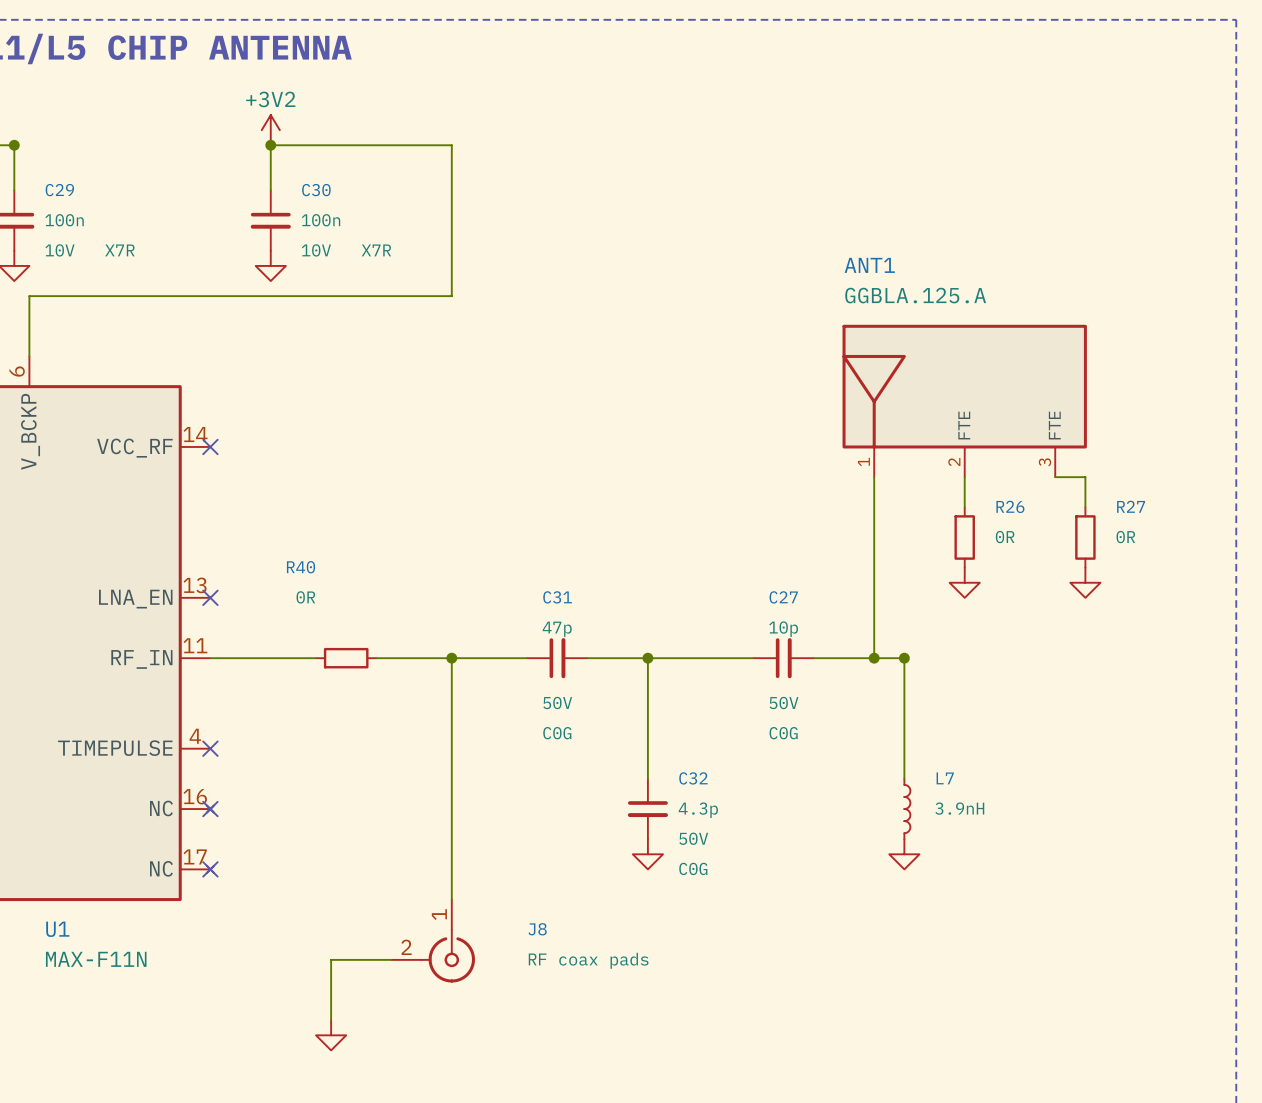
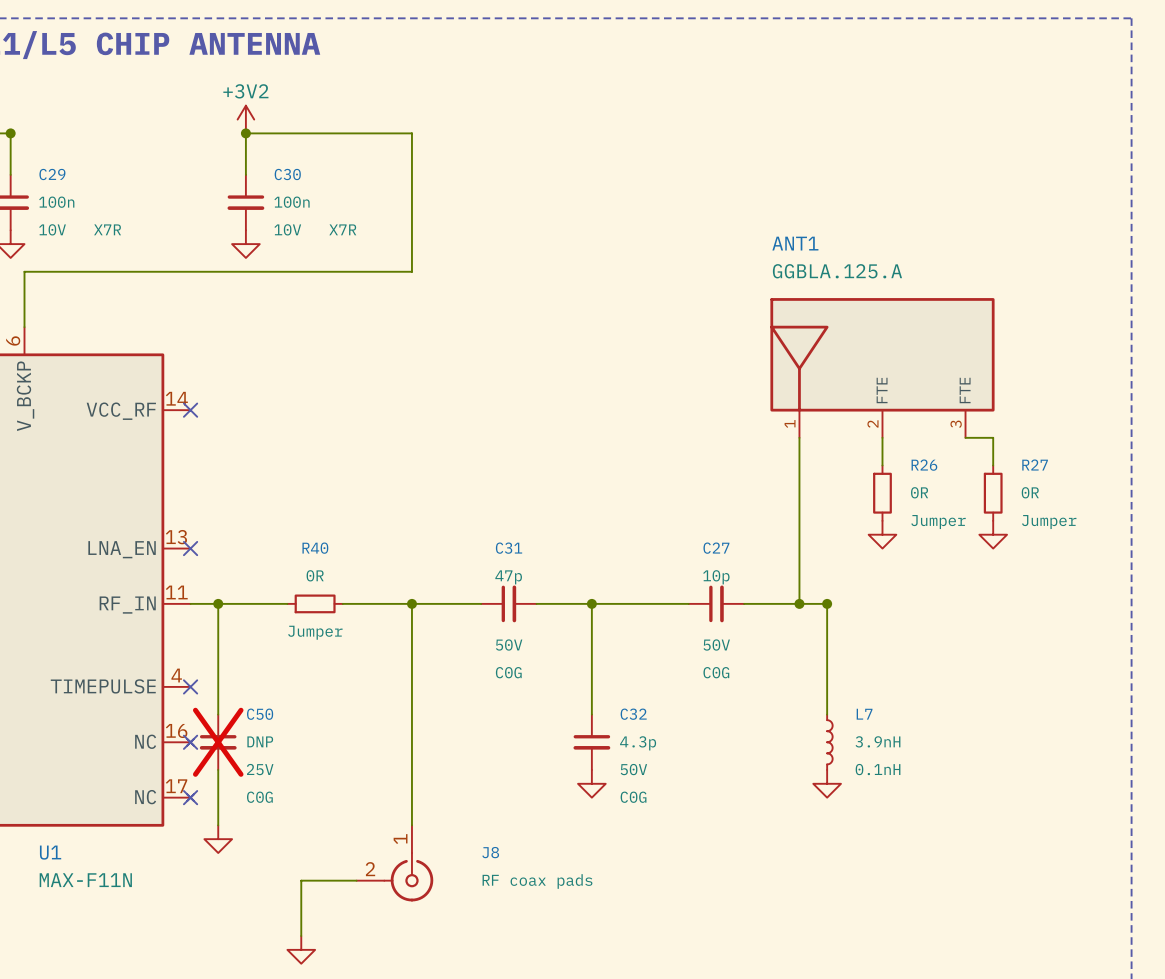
R40 name position: R40 (301, 567) -> R40 (315, 548)
R26 text: none -> Jumper (938, 522)
R27 text: none -> Jumper (1049, 522)
R40 value position: 0R (305, 597) -> 0R (315, 575)
wire: none -> (218, 603) (218, 714)
junction: none -> (218, 603)
R40 text: none -> Jumper (315, 632)
C50: none -> DNP (218, 742)
L7 text: none -> 0.1nH (878, 769)
wire: none -> (218, 769) (218, 825)
power symbol: none -> (218, 839)

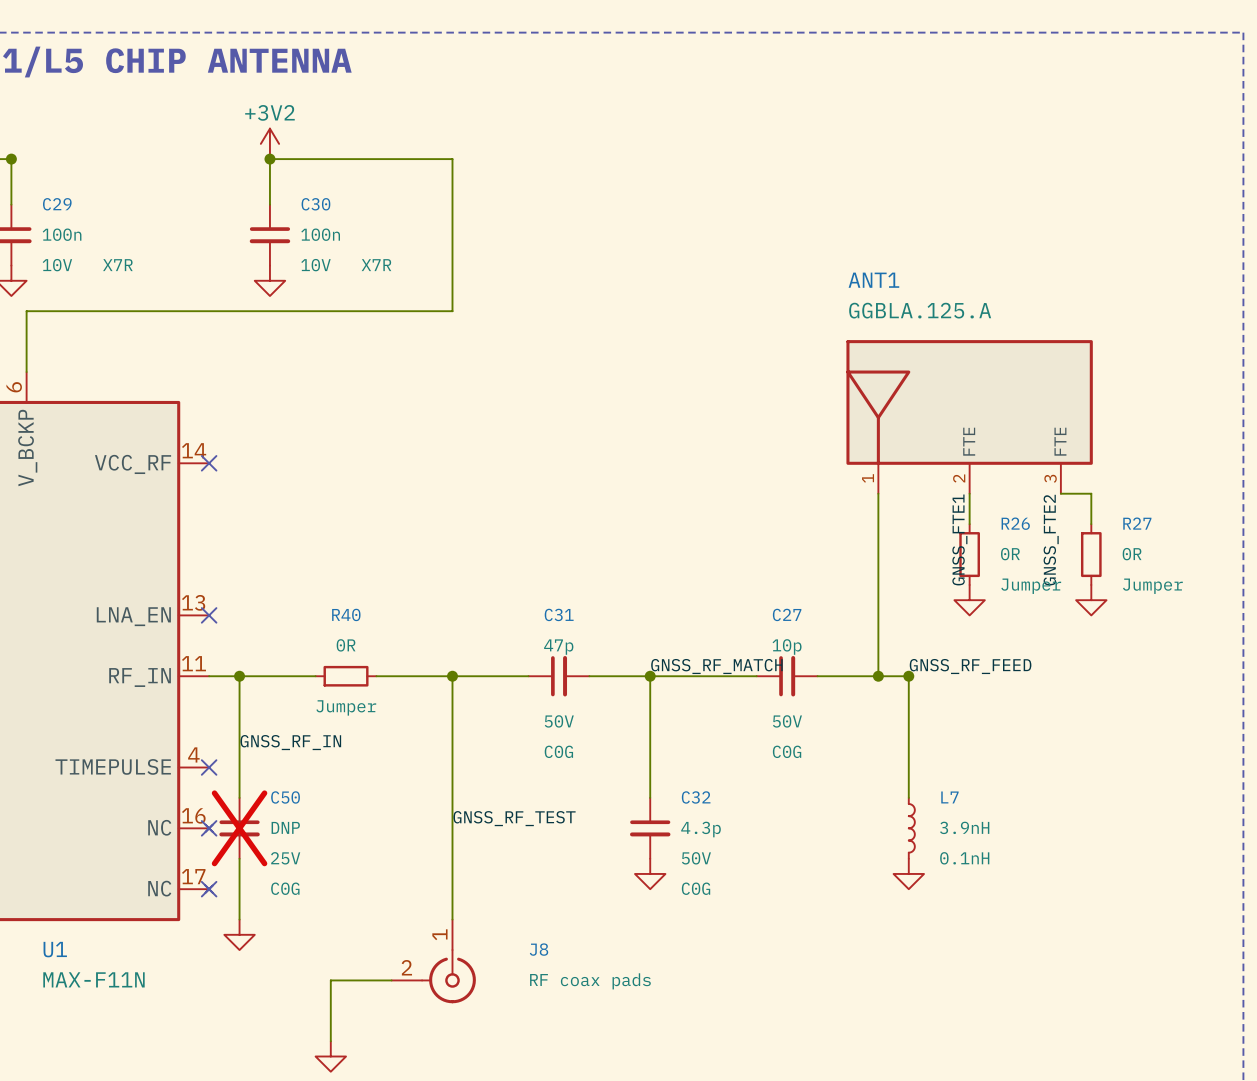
label: none -> GNSS_FTE1 (959, 539)
label: none -> GNSS_FTE2 (1051, 540)
label: none -> GNSS_RF_MATCH (716, 666)
label: none -> GNSS_RF_FEED (970, 666)
label: none -> GNSS_RF_IN (290, 742)
label: none -> GNSS_RF_TEST (514, 818)

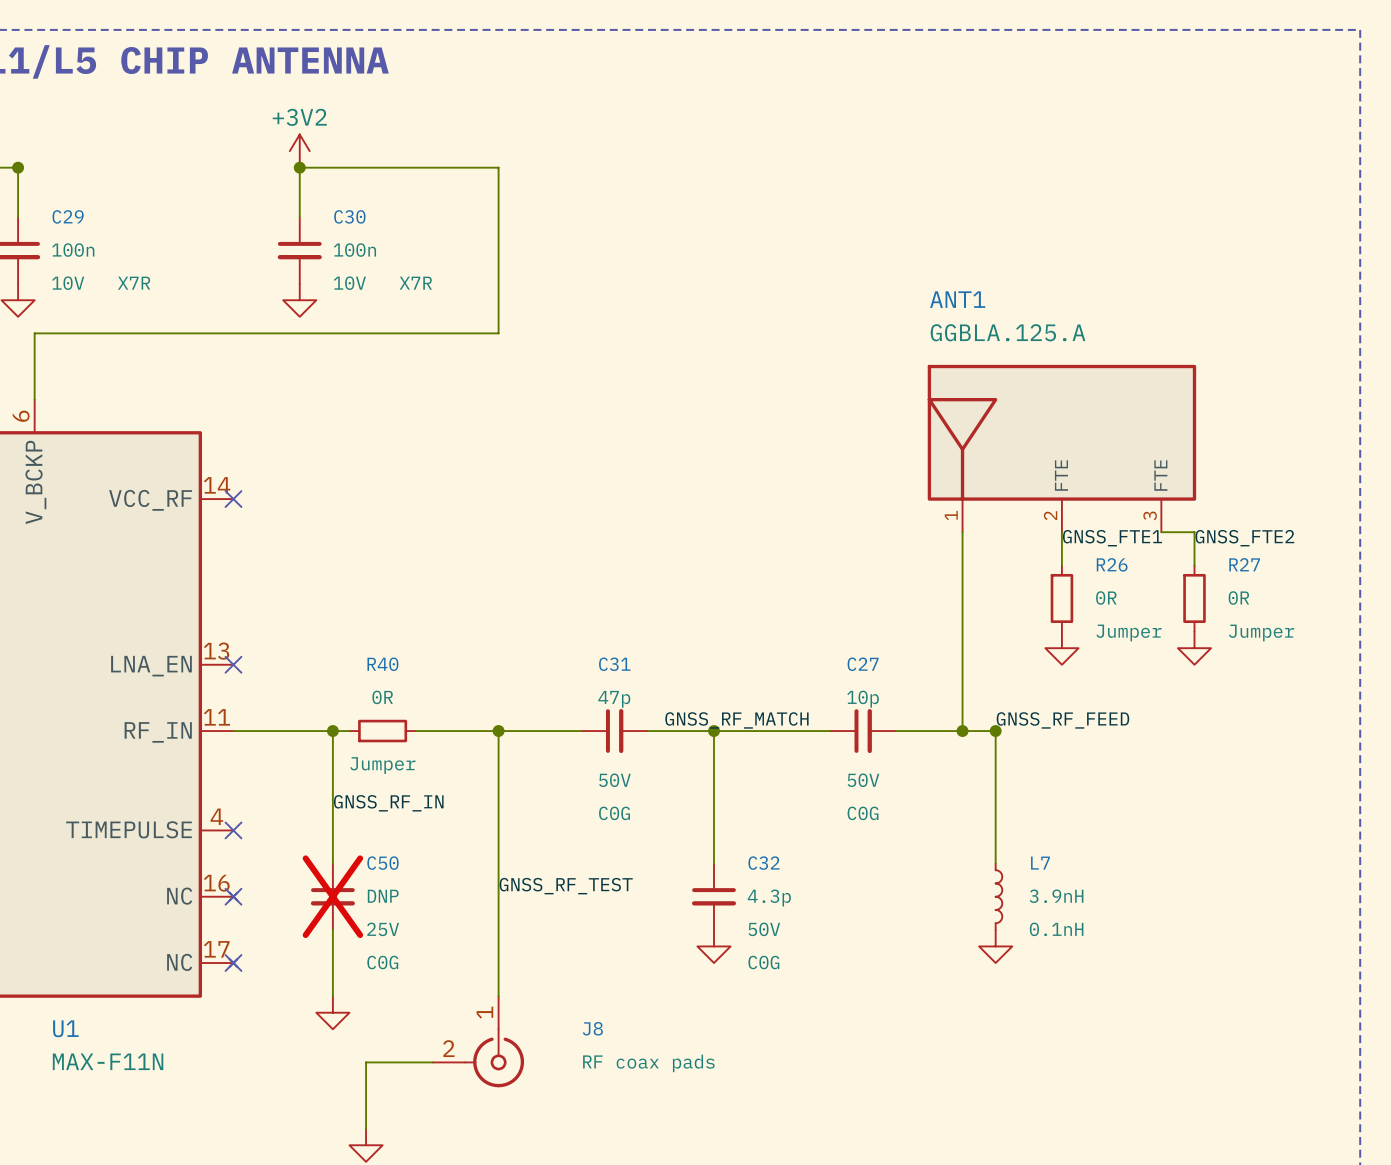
label rotation: 0° (959, 539) -> 90° clockwise (1112, 538)
label rotation: 0° (1051, 540) -> 90° clockwise (1244, 538)
label position: GNSS_RF_MATCH (716, 666) -> GNSS_RF_MATCH (736, 720)
wire: (239, 676) (239, 797) -> (332, 731) (332, 863)
junction position: (239, 676) -> (332, 731)
label position: GNSS_RF_IN (290, 742) -> GNSS_RF_IN (388, 803)
C50 position: (239, 828) -> (332, 896)
wire: (239, 858) (239, 919) -> (332, 929) (332, 996)
power symbol position: (239, 934) -> (332, 1012)

